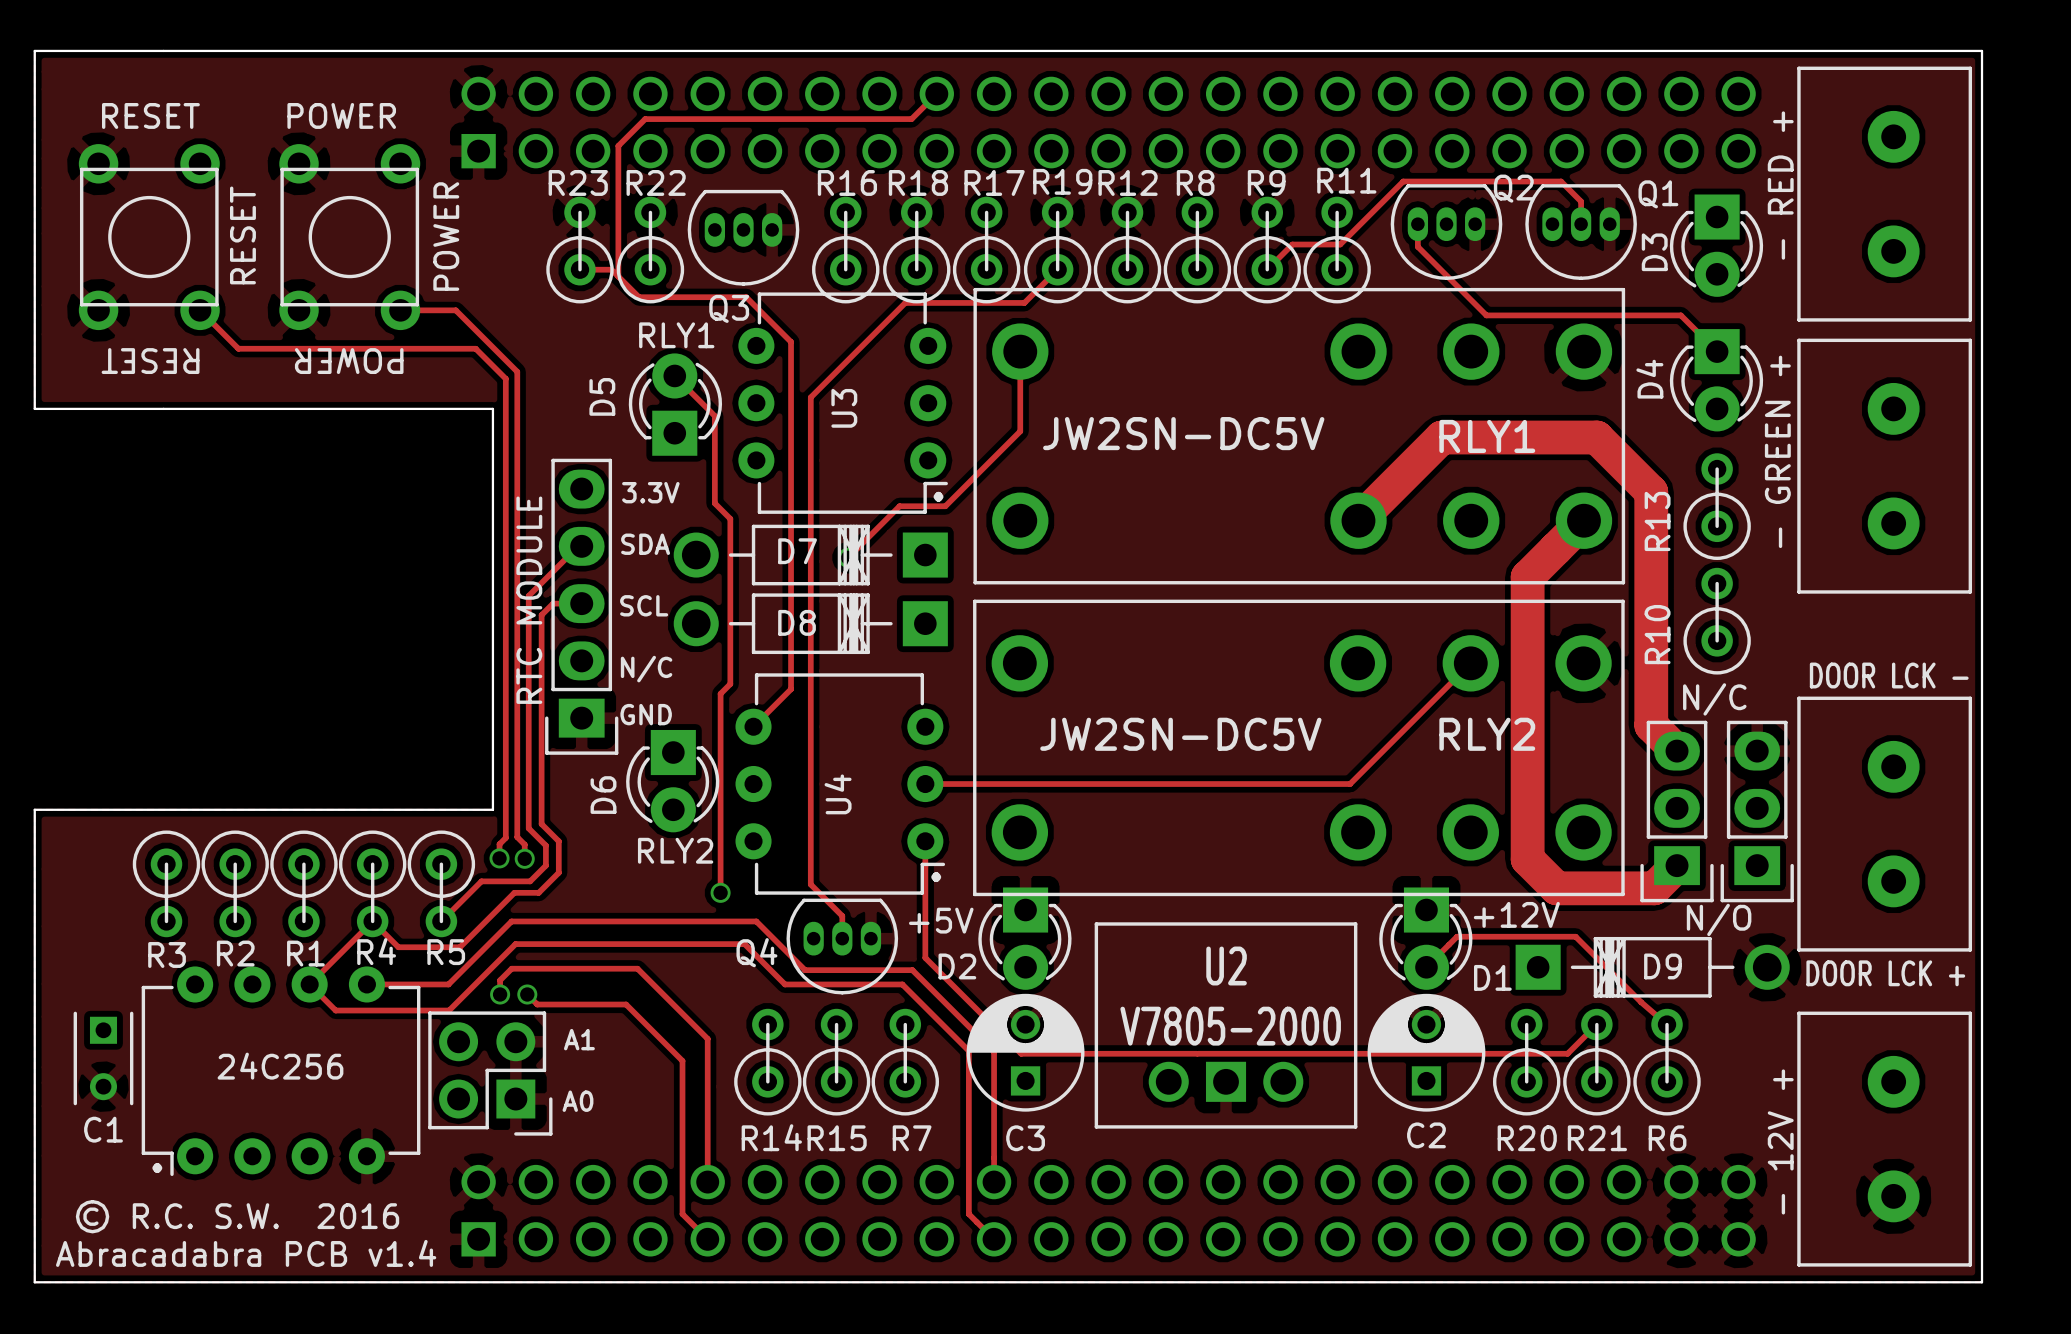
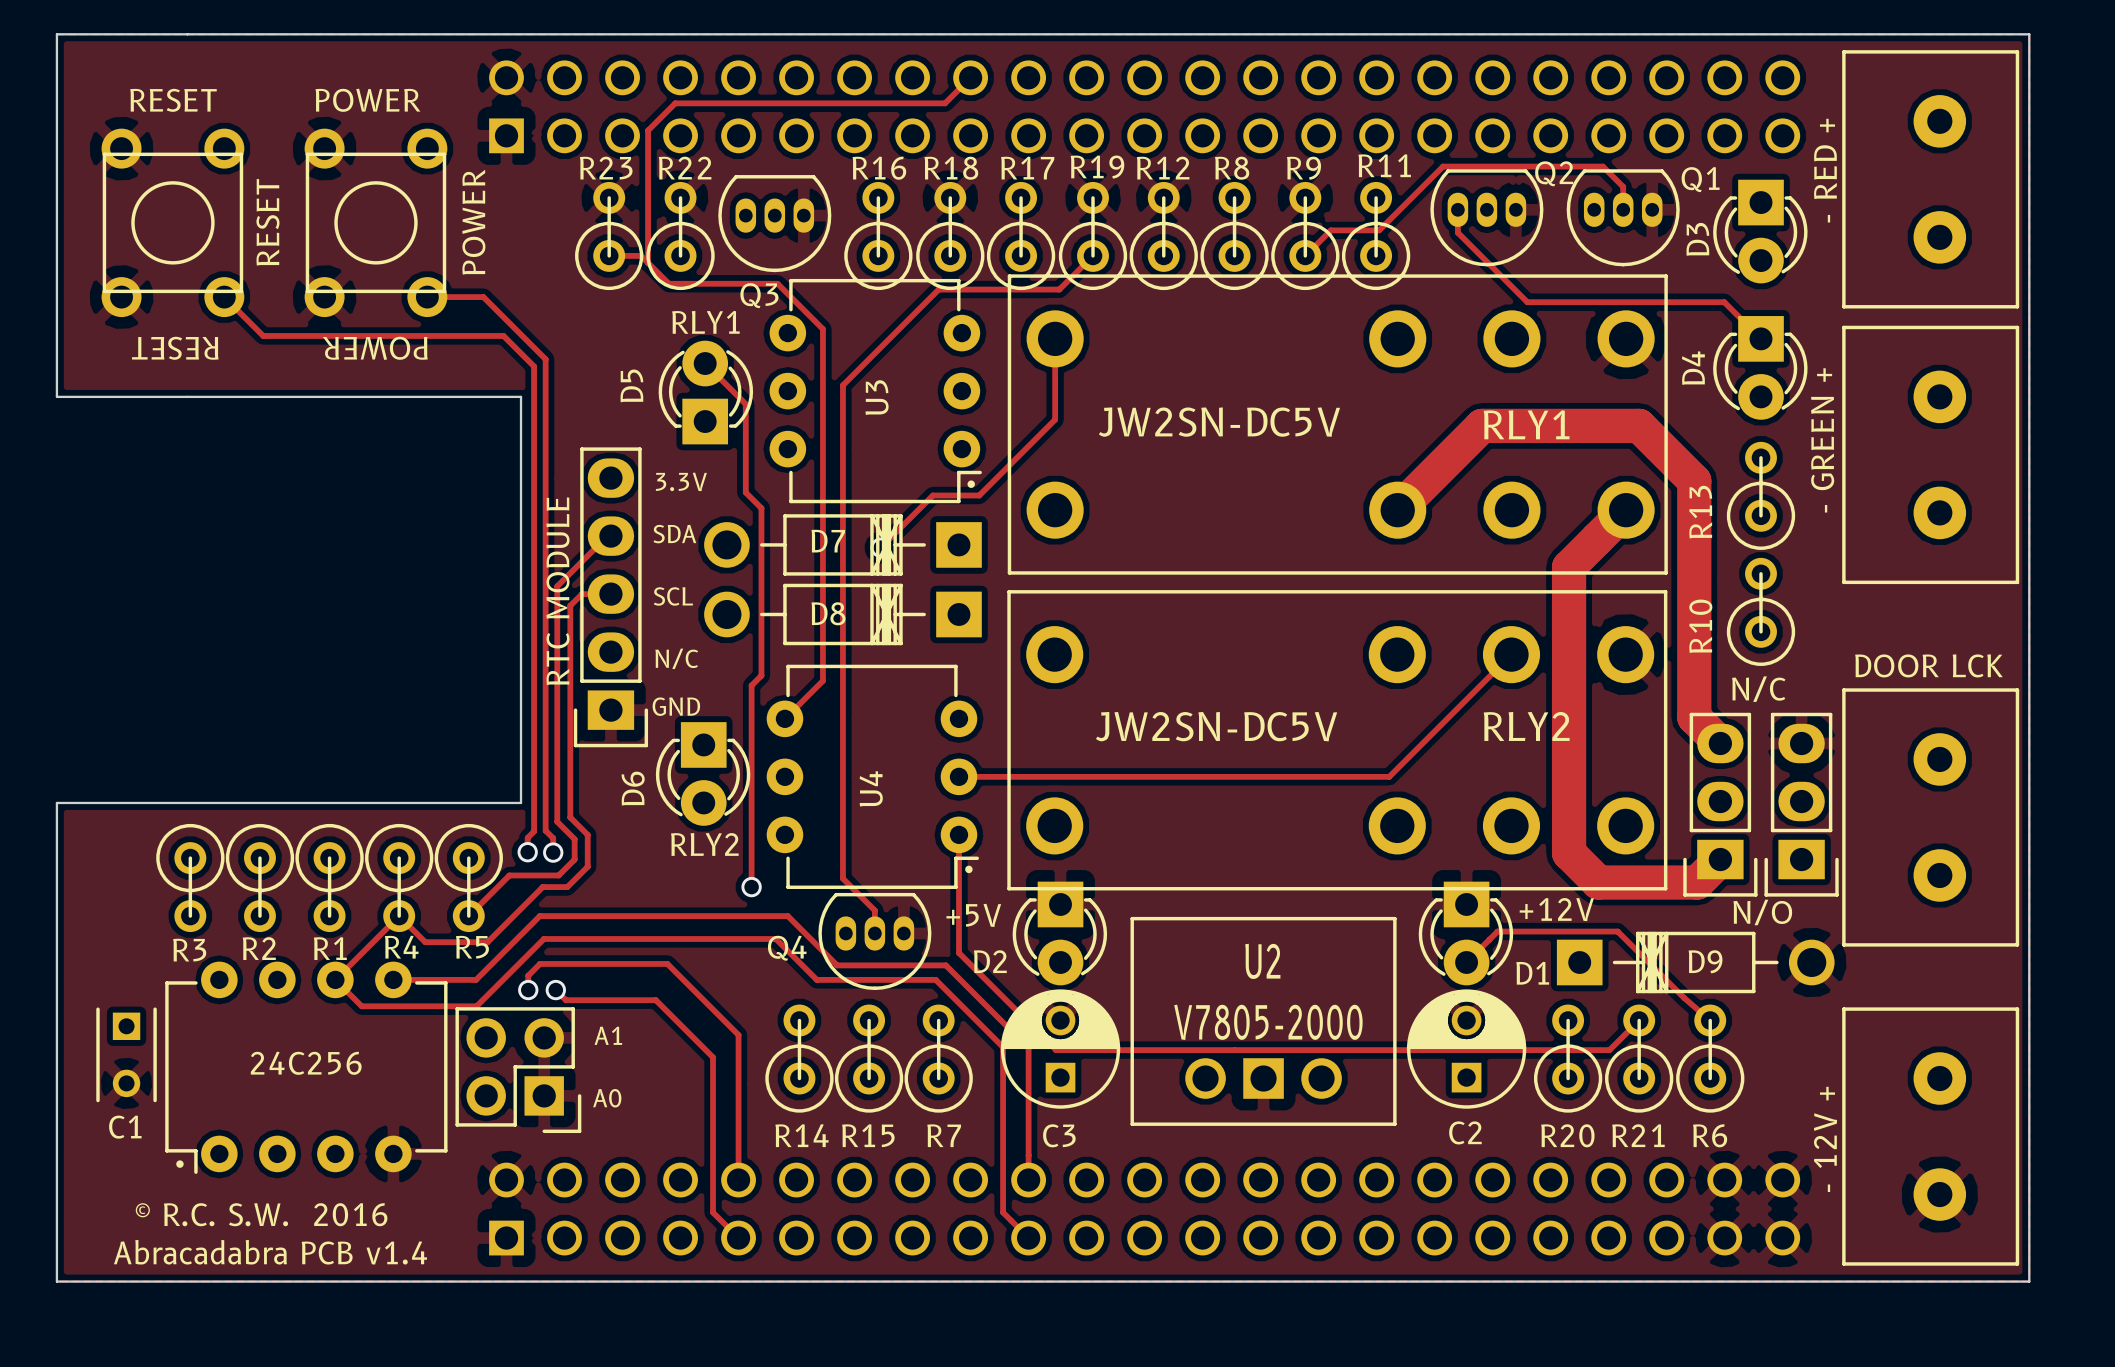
text: DOOR LCK - (1889, 675) -> DOOR LCK (1928, 665)
text: DOOR LCK + (1885, 973) -> none

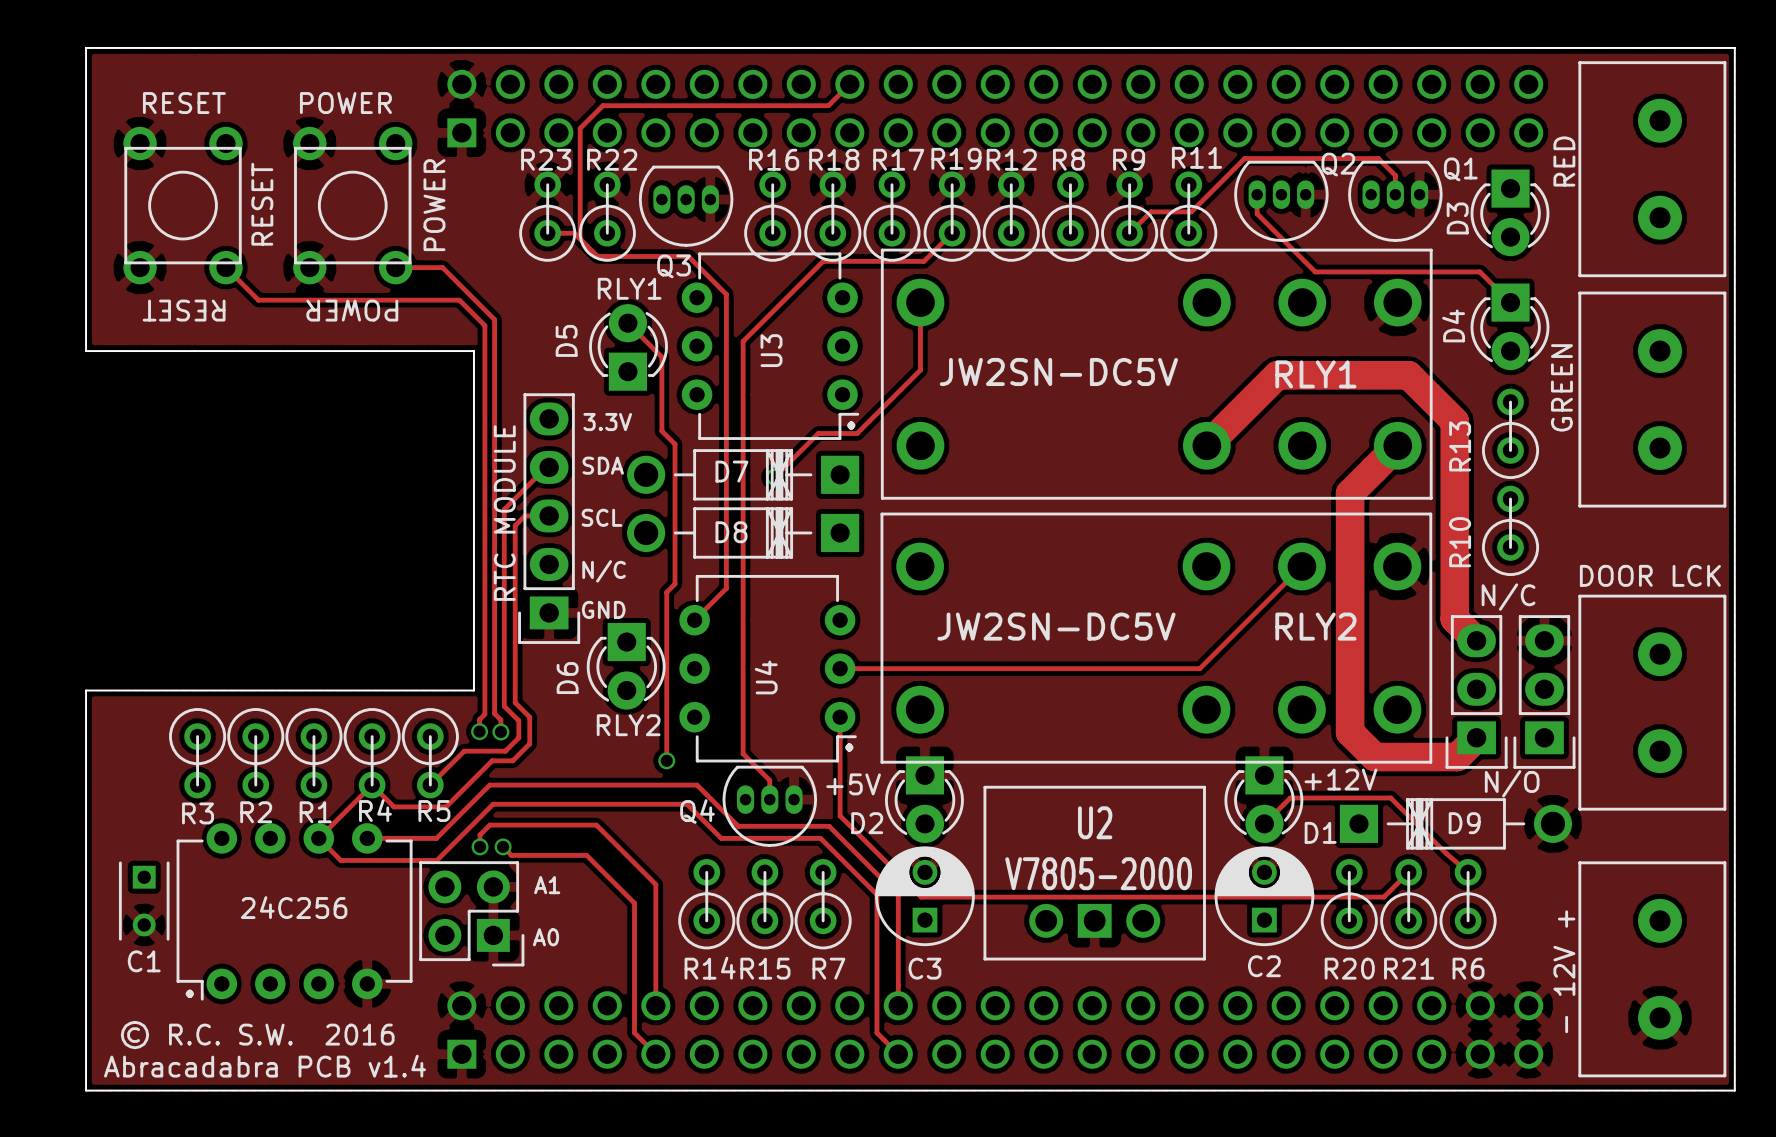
text: - RED + (1825, 170) -> RED (1564, 161)
text: - GREEN + (1822, 440) -> GREEN (1561, 387)

